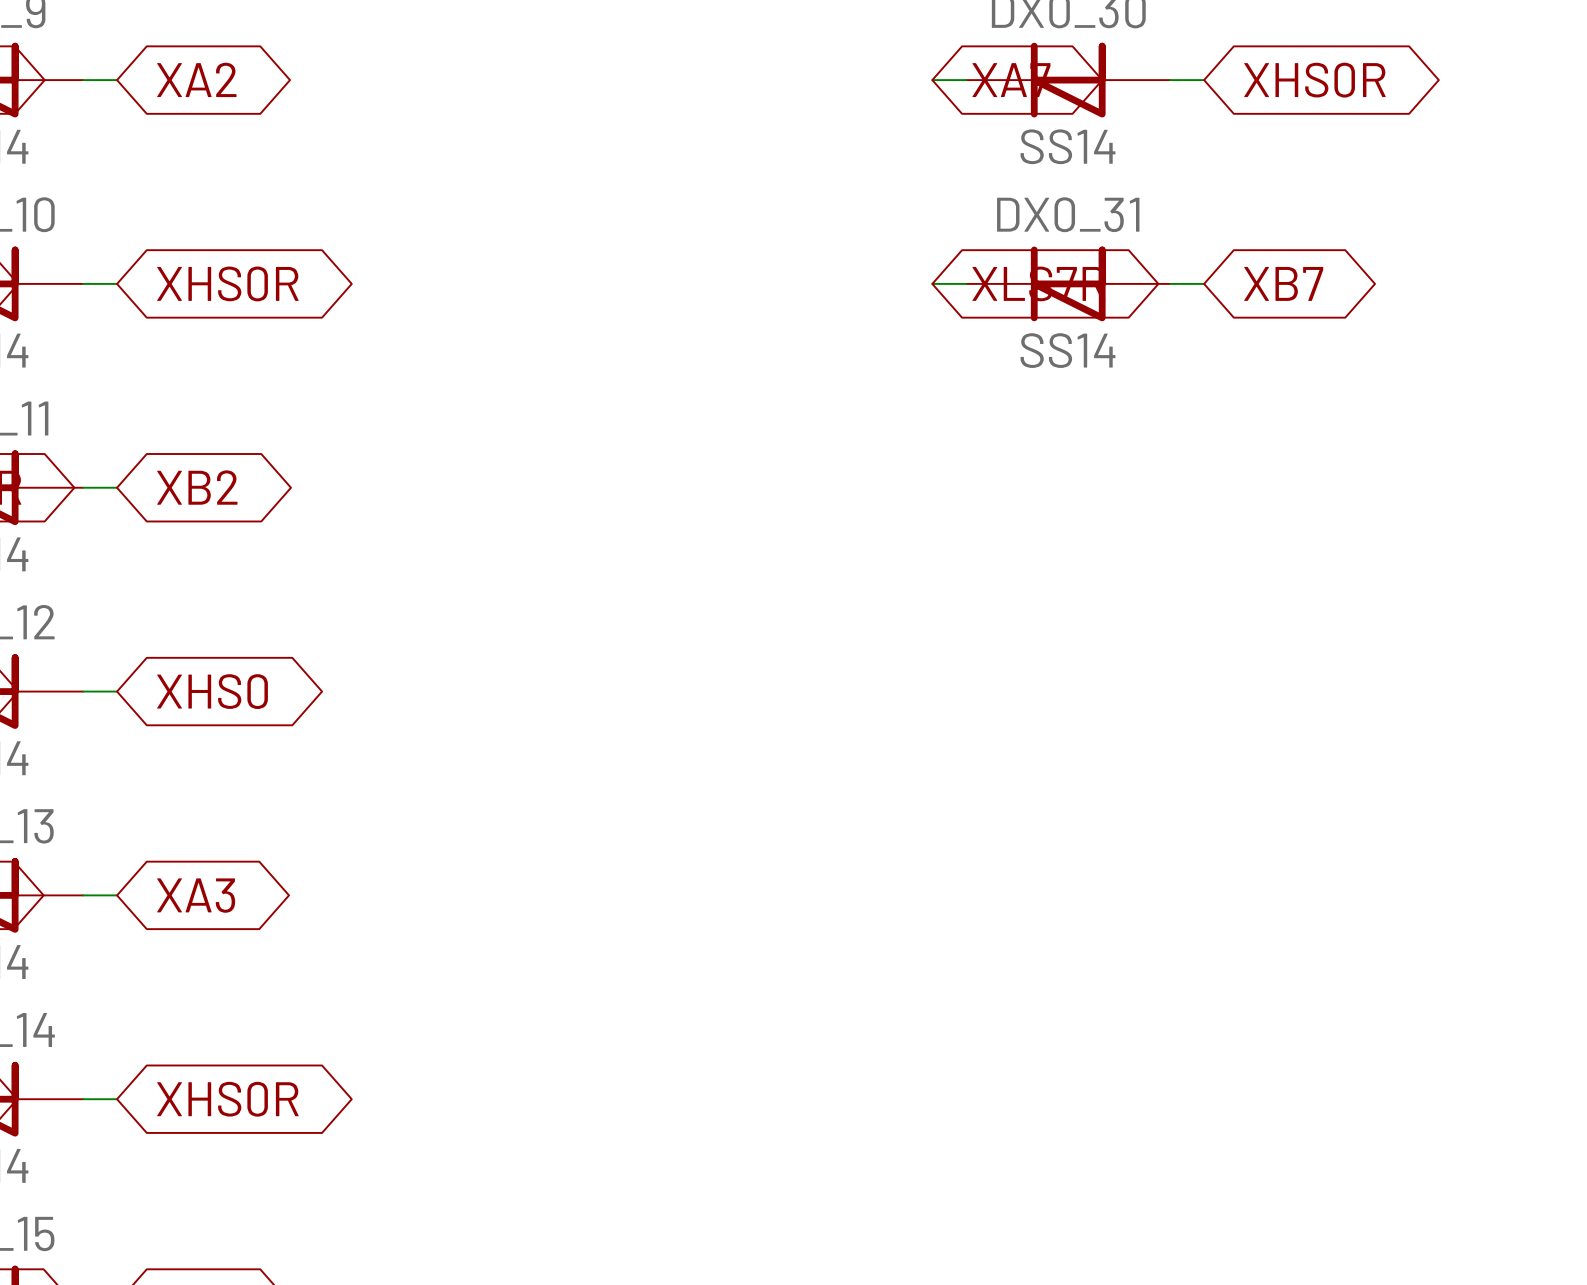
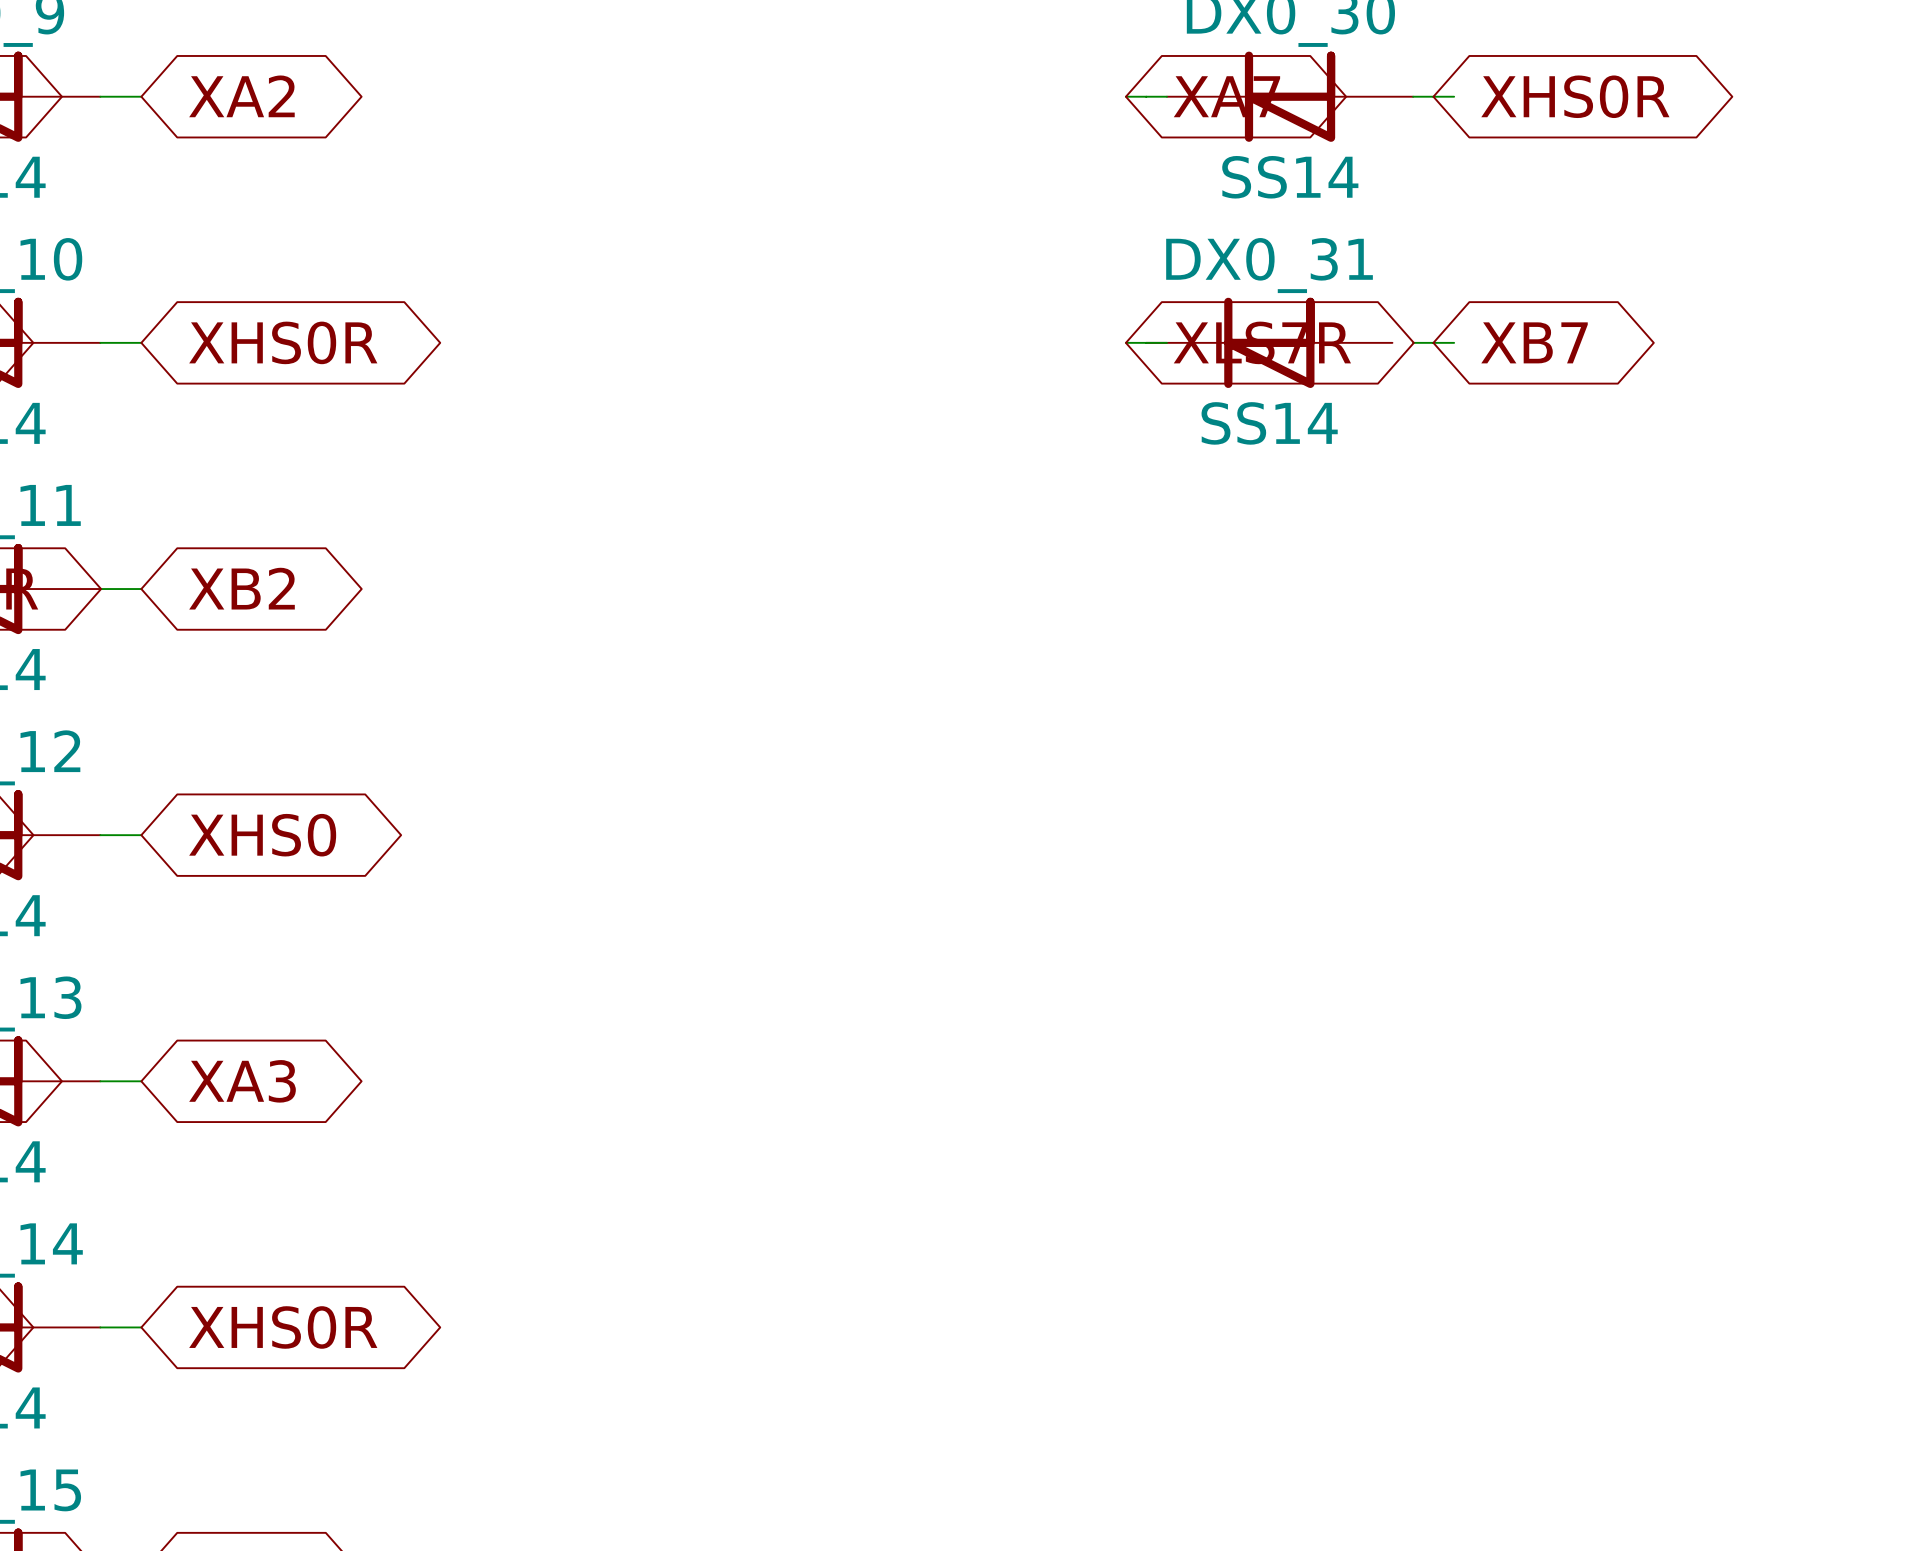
global label position: XHS0R (1314, 80) -> XHS0R (1575, 96)
DX0_31 position: (1068, 283) -> (1269, 342)
global label position: XB7 (1283, 283) -> XB7 (1534, 342)

